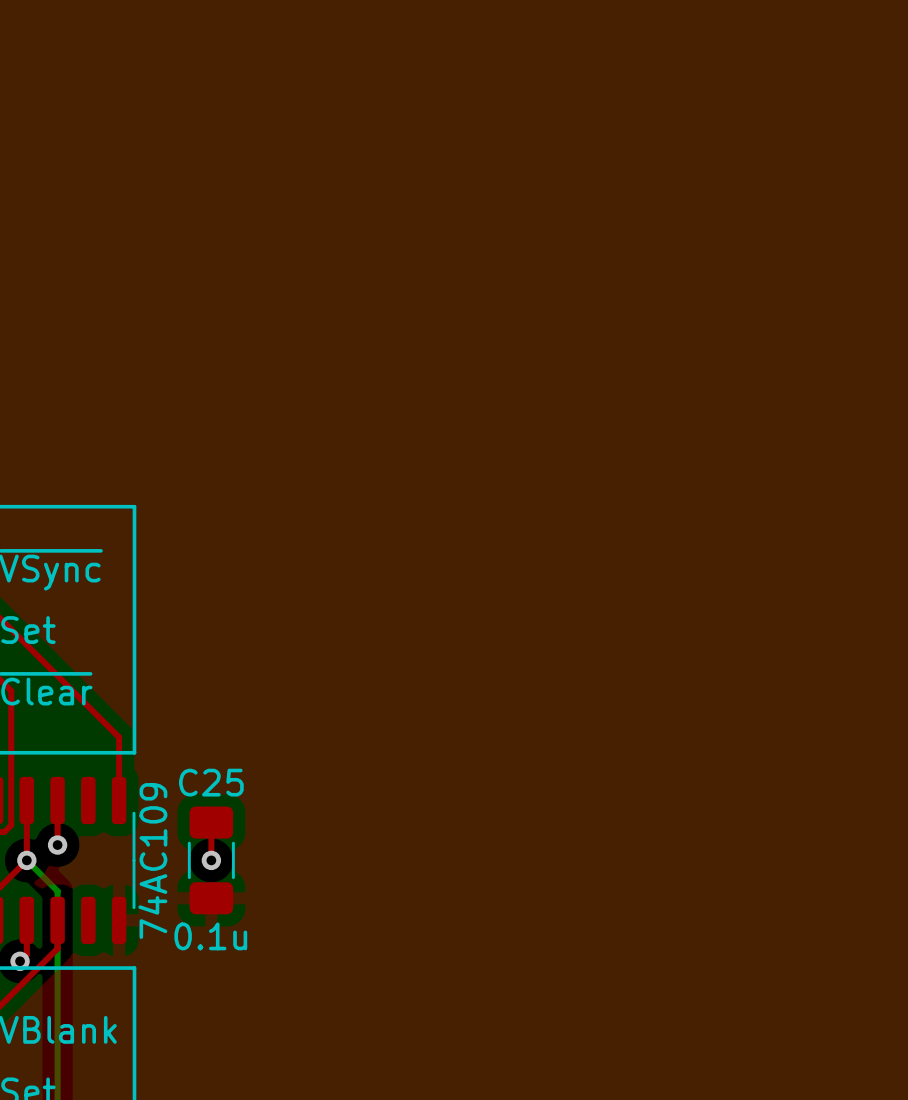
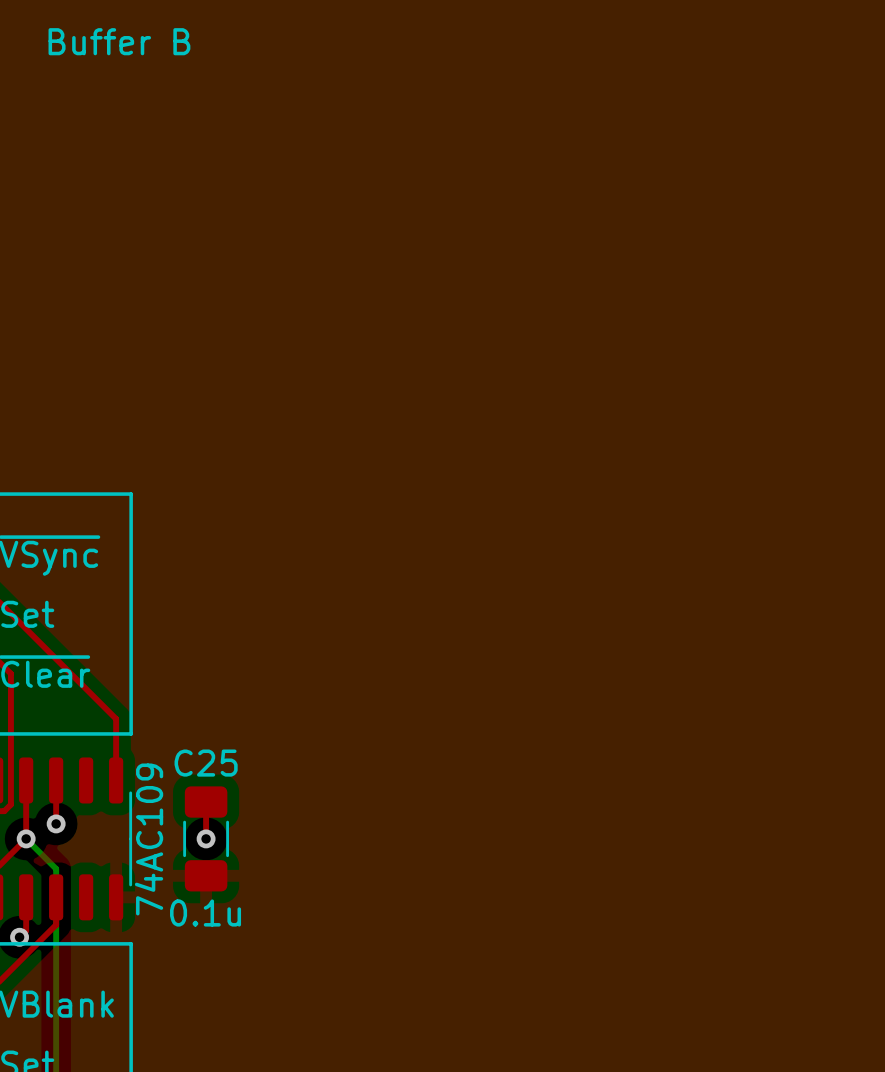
text: none -> Buffer B (119, 41)

